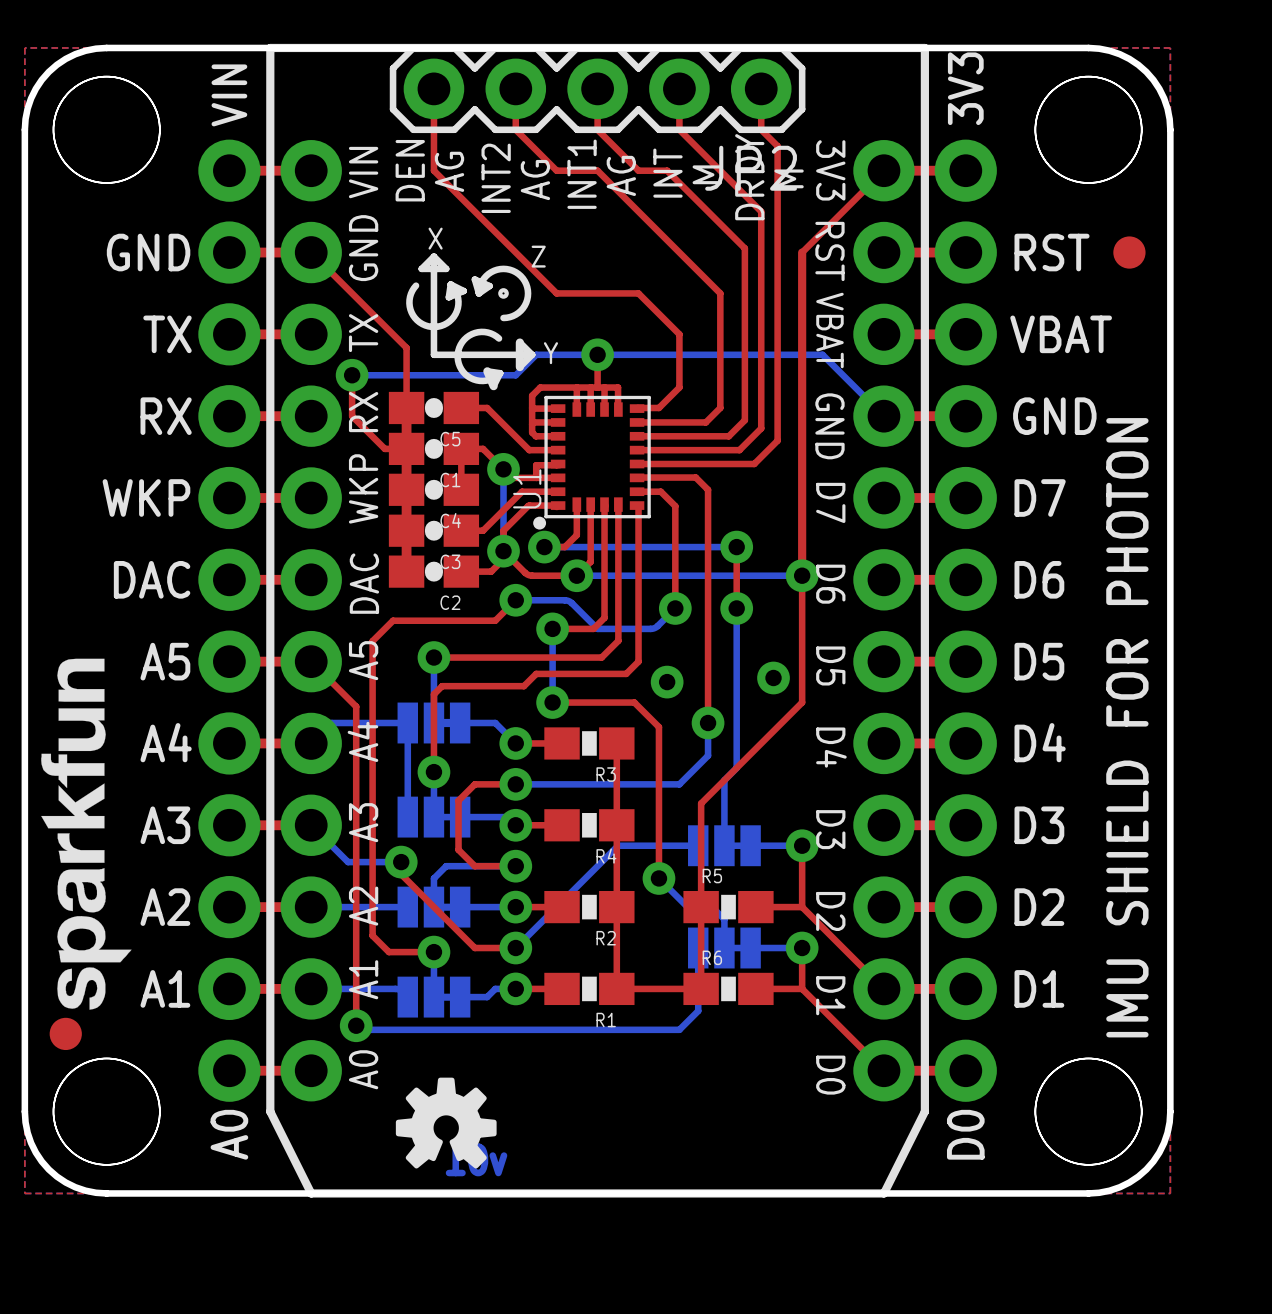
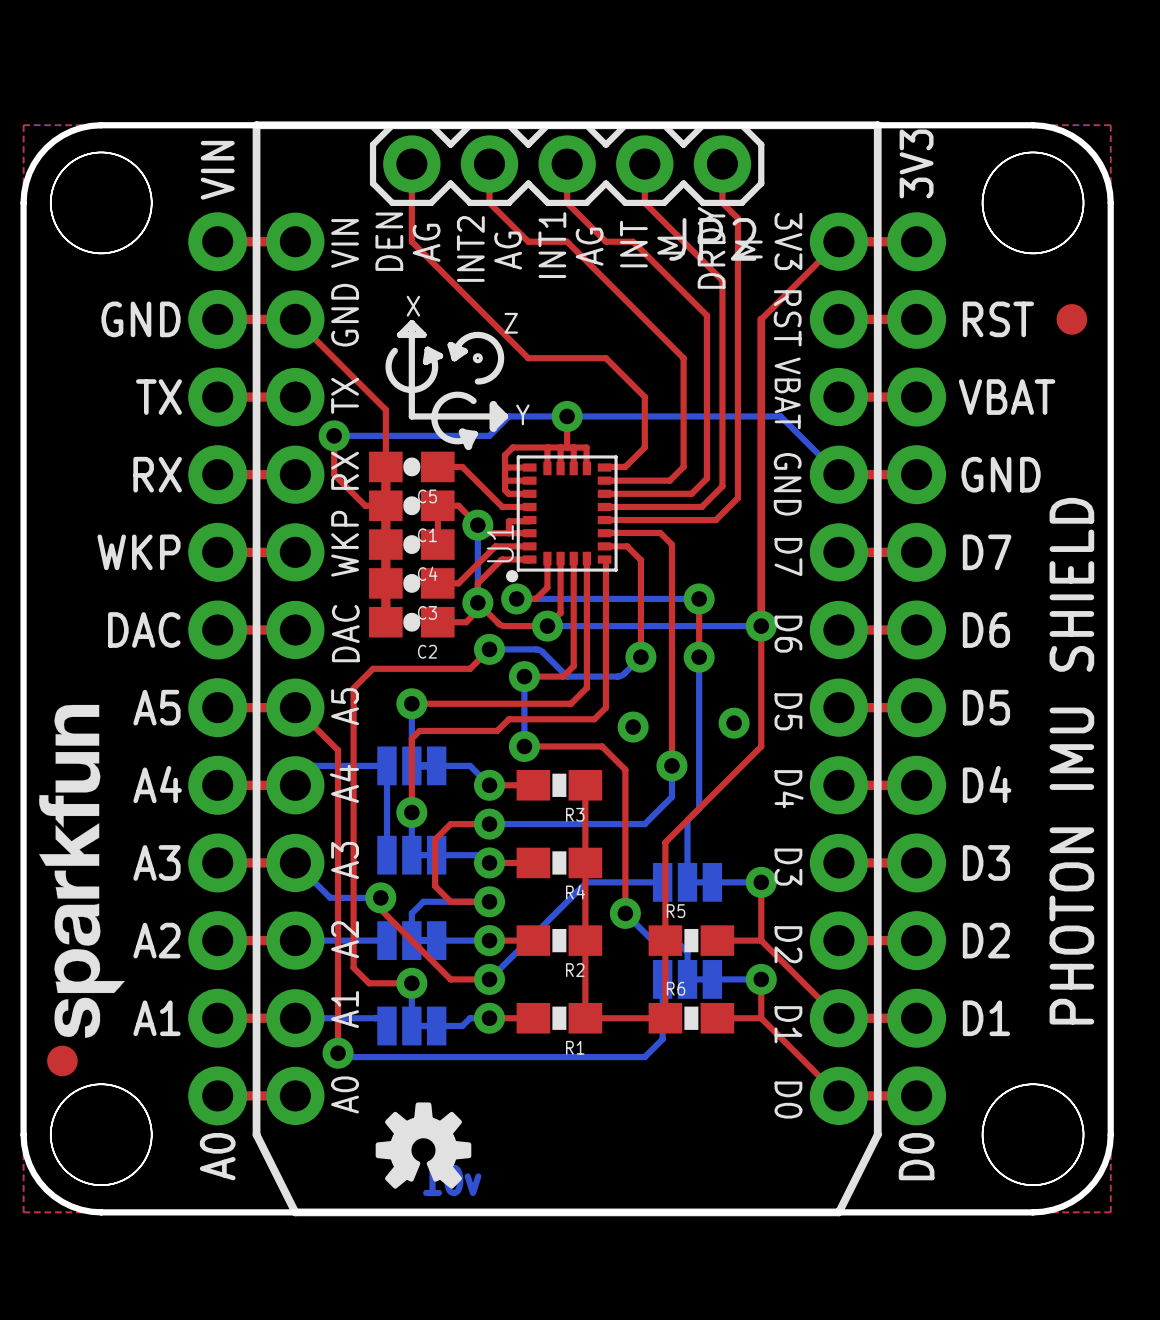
text: none -> PHOTON IMU SHIELD (1071, 761)
text: IMU SHIELD FOR PHOTON (1127, 727) -> none

